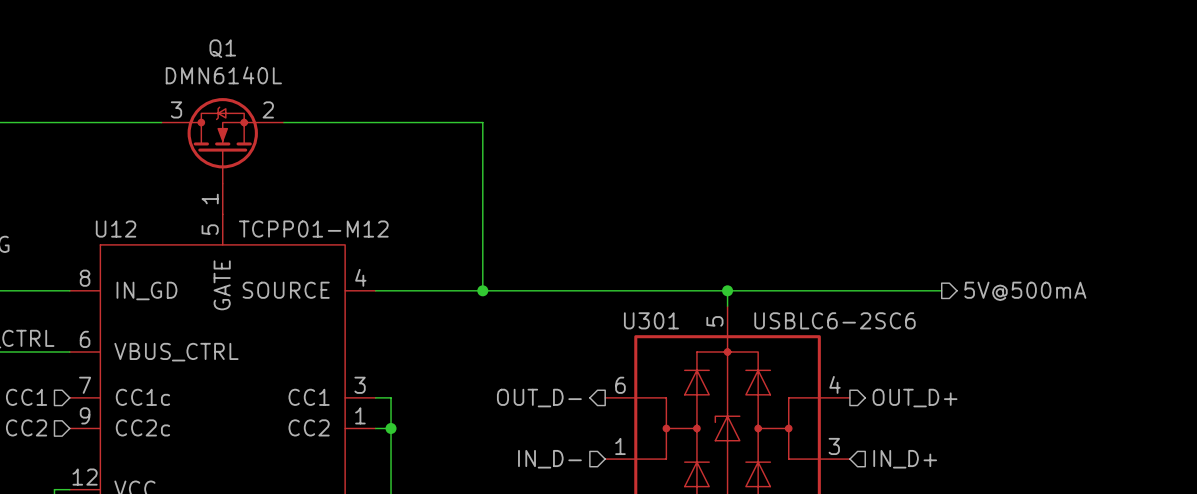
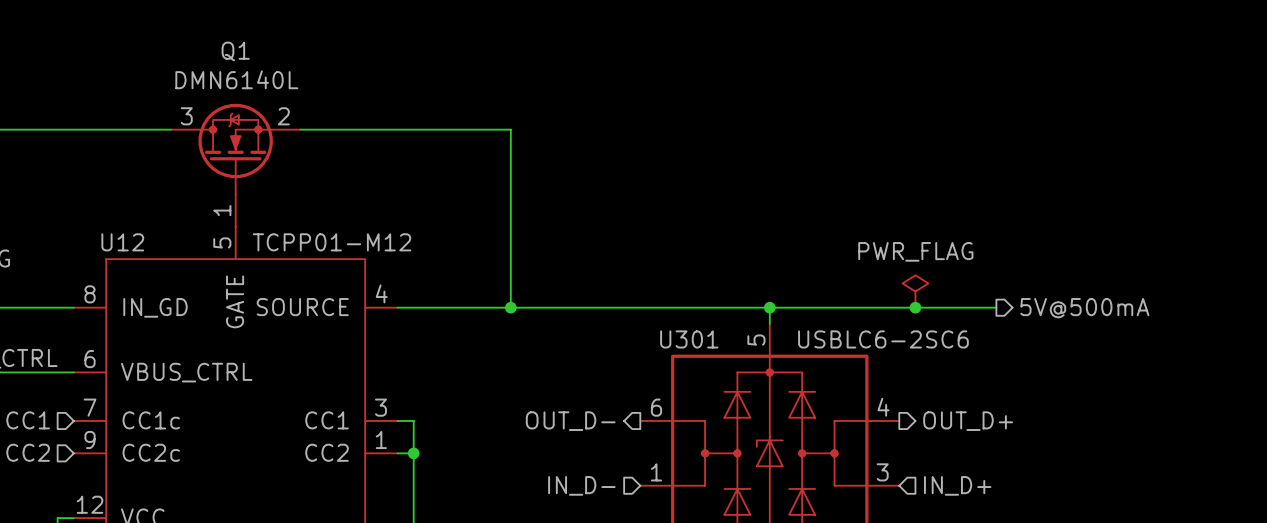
power symbol: none -> PWR_FLAG (915, 291)
junction: none -> (915, 307)

